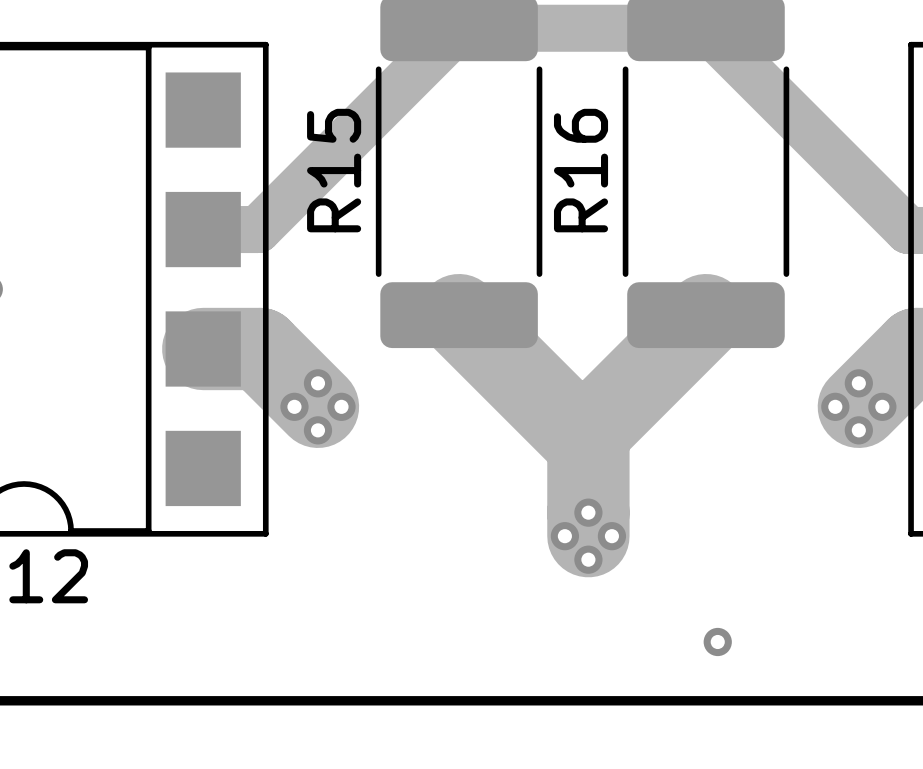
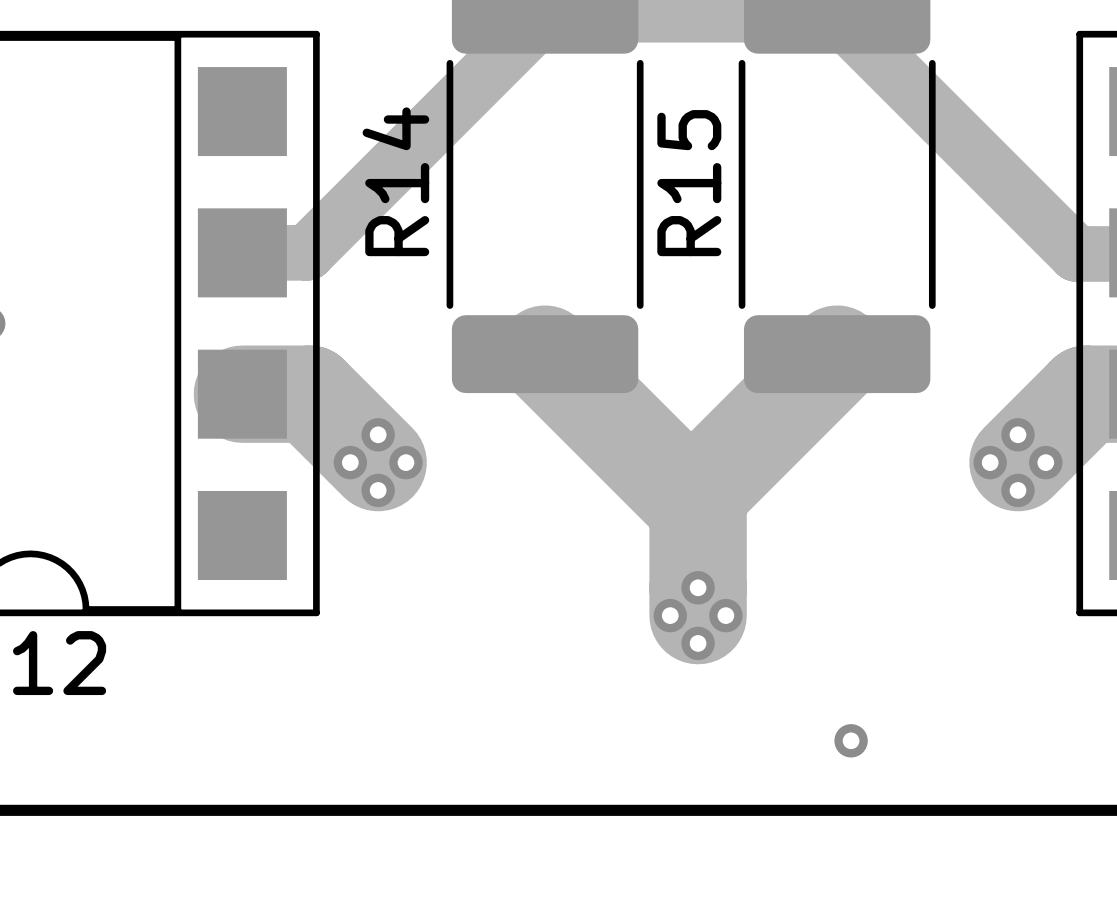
R15 name: R15 (334, 170) -> R14 (395, 181)
R16 name: R16 (581, 170) -> R15 (689, 183)

